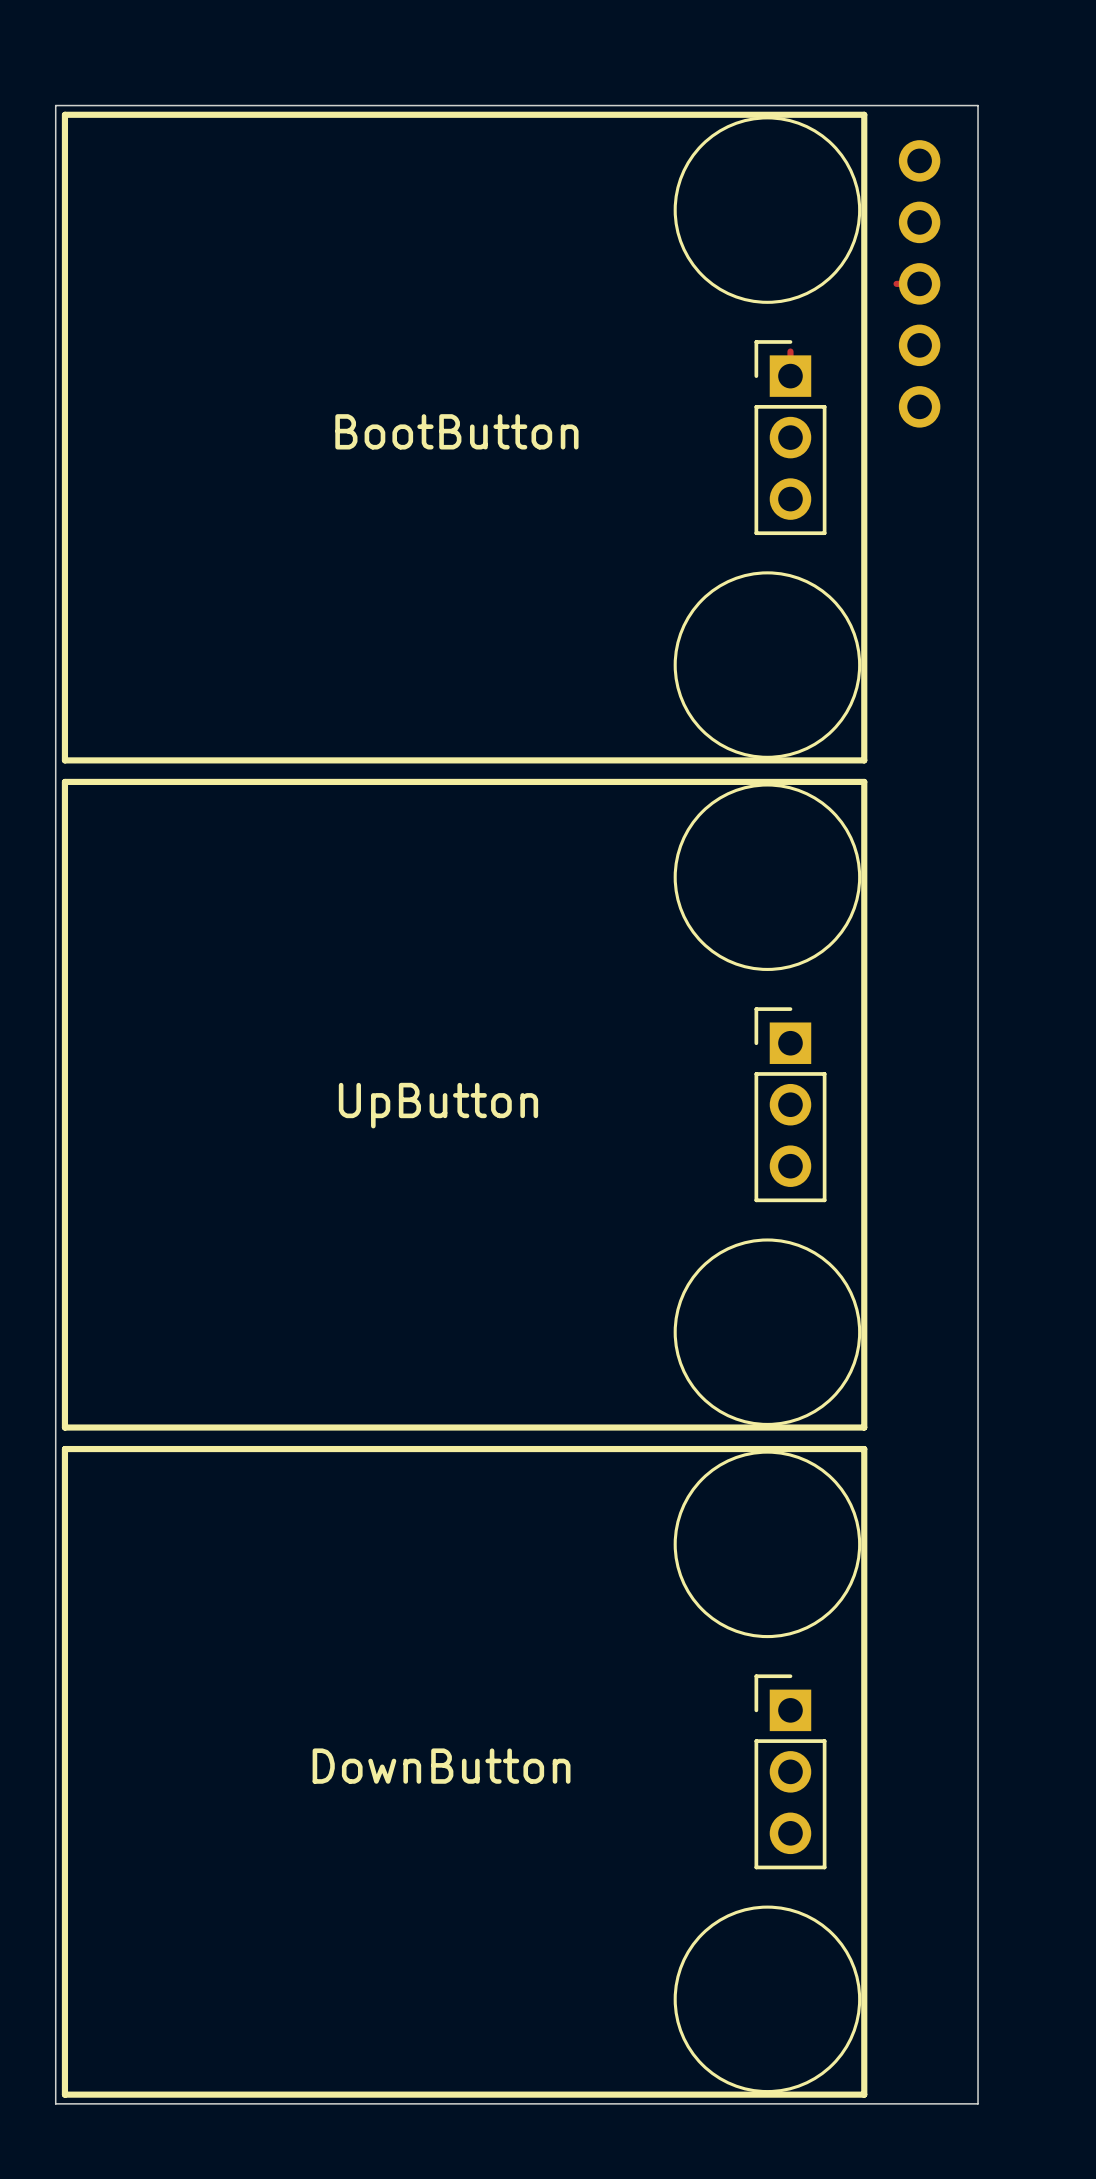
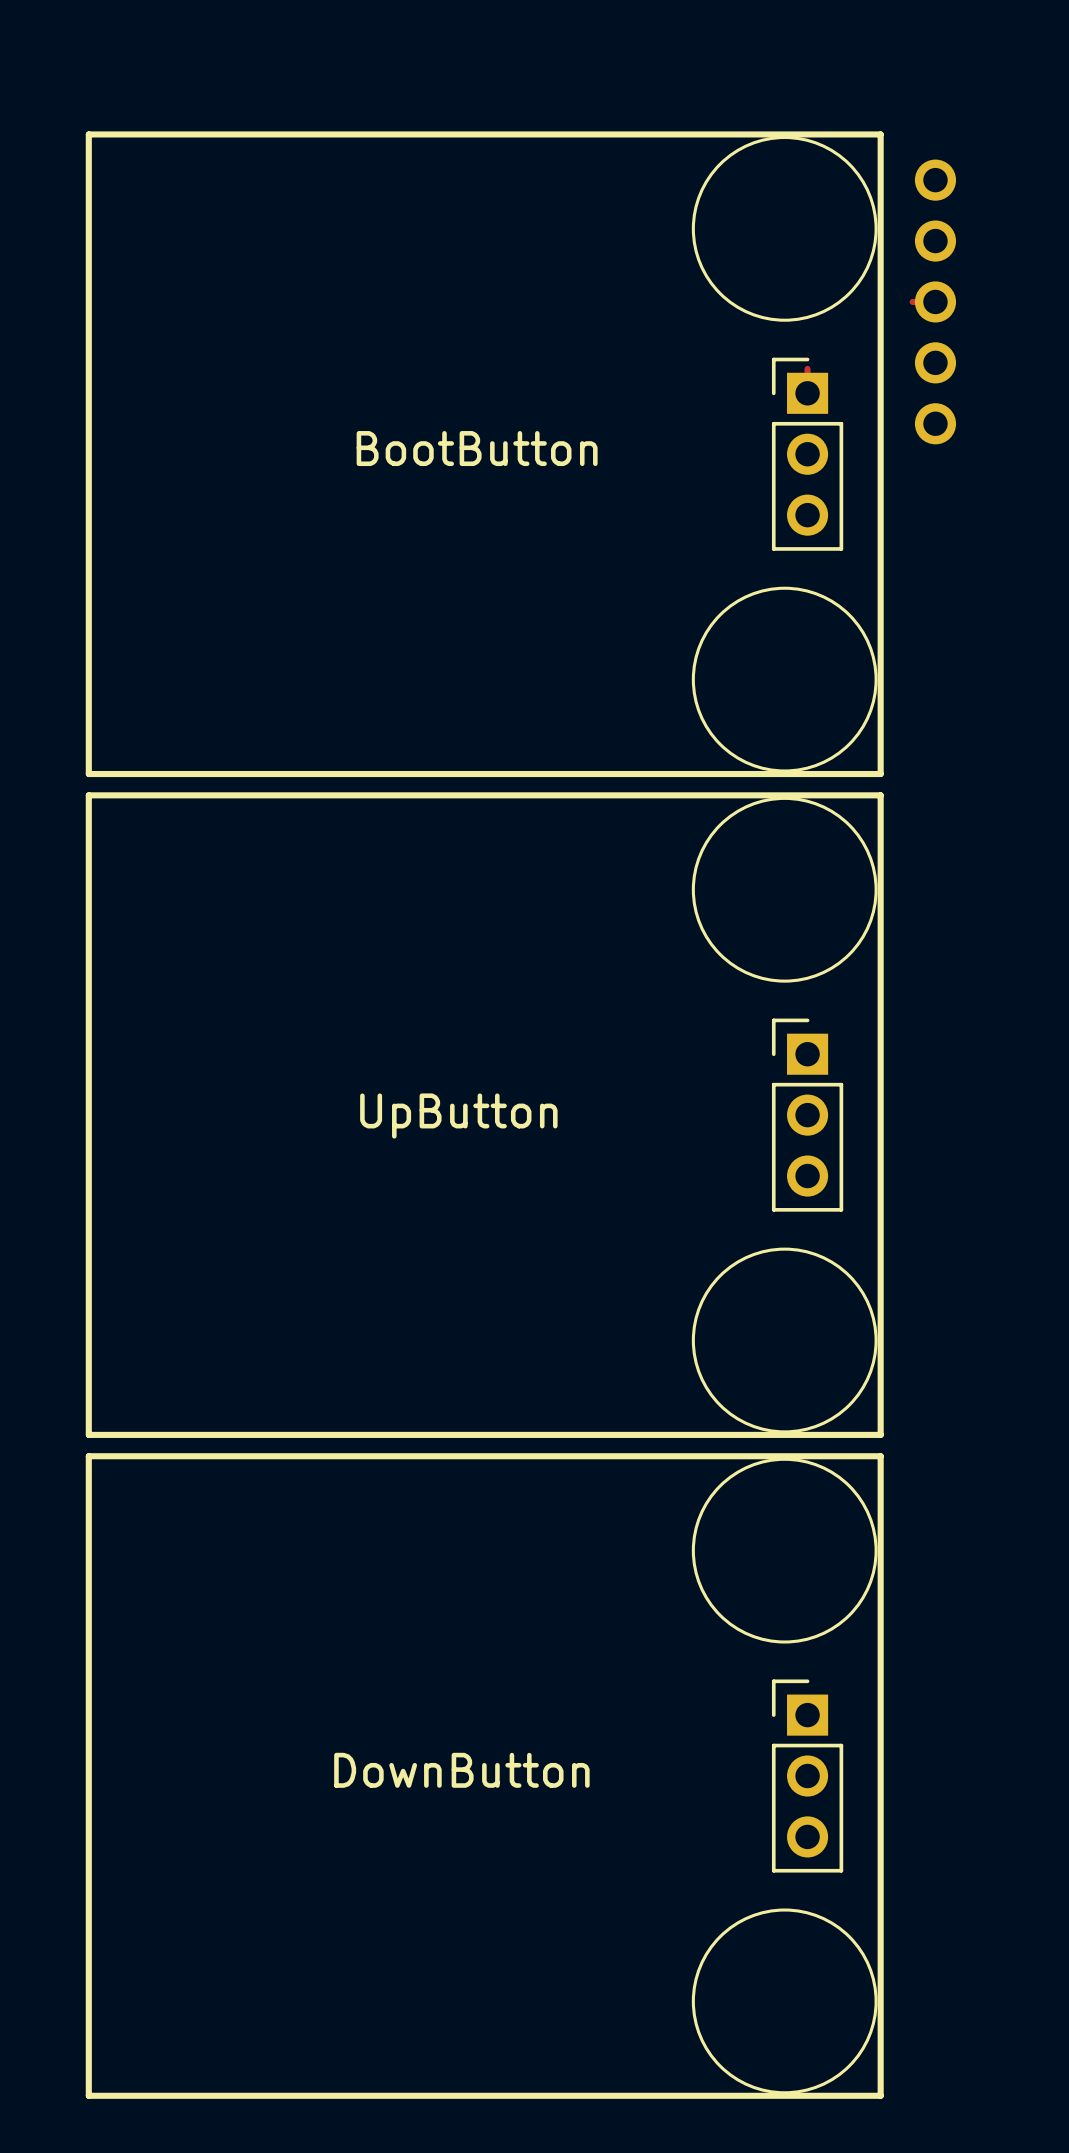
board edge: (55, 105) (978, 105) (978, 2103) (55, 2103) (55, 105) -> none

